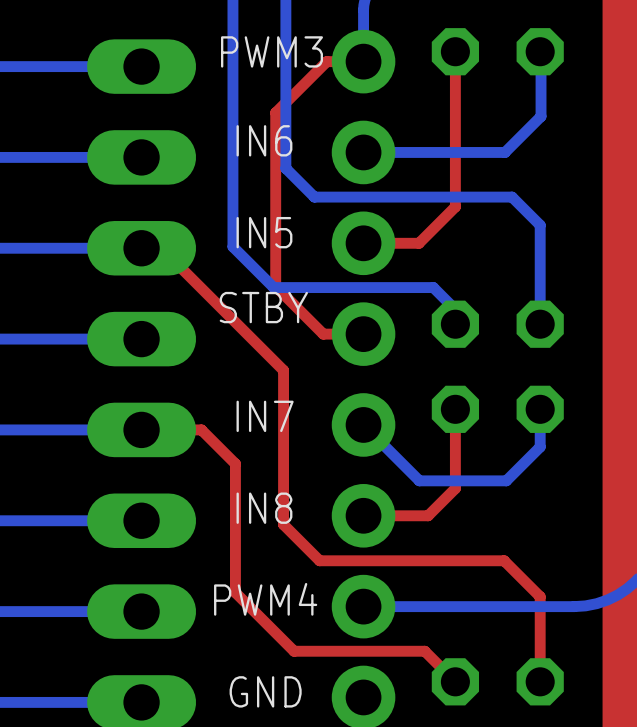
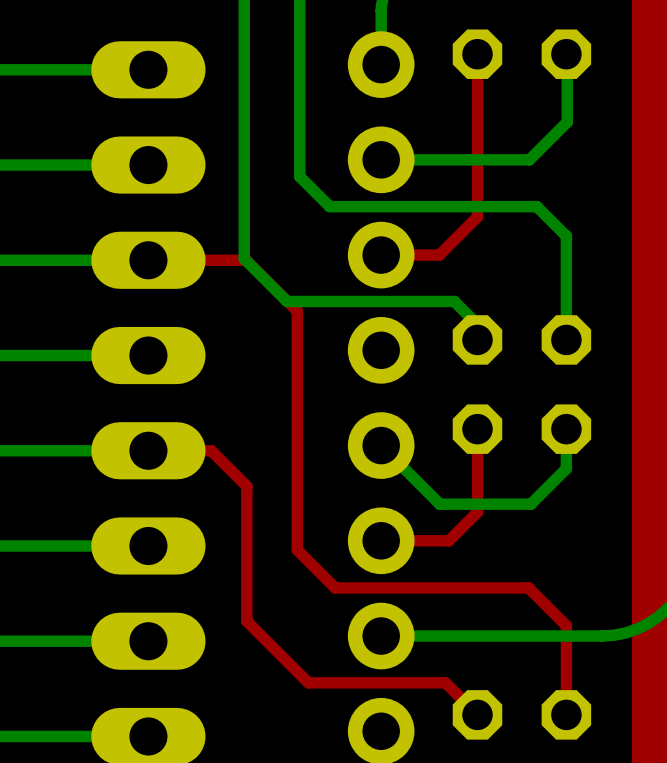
text: PWM3 (271, 51) -> none
top track: (363, 61) (326, 61) (275, 112) (275, 286) (323, 334) (363, 334) -> none
text: IN6 (264, 140) -> none
text: IN5 (264, 232) -> none
top track: (161, 248) (283, 370) (283, 524) -> (169, 260) (246, 260) (297, 311) (297, 550)
text: STBY (263, 307) -> none
text: IN7 (265, 416) -> none
text: IN8 (264, 508) -> none
text: PWM4 (265, 599) -> none
text: GND (265, 691) -> none

